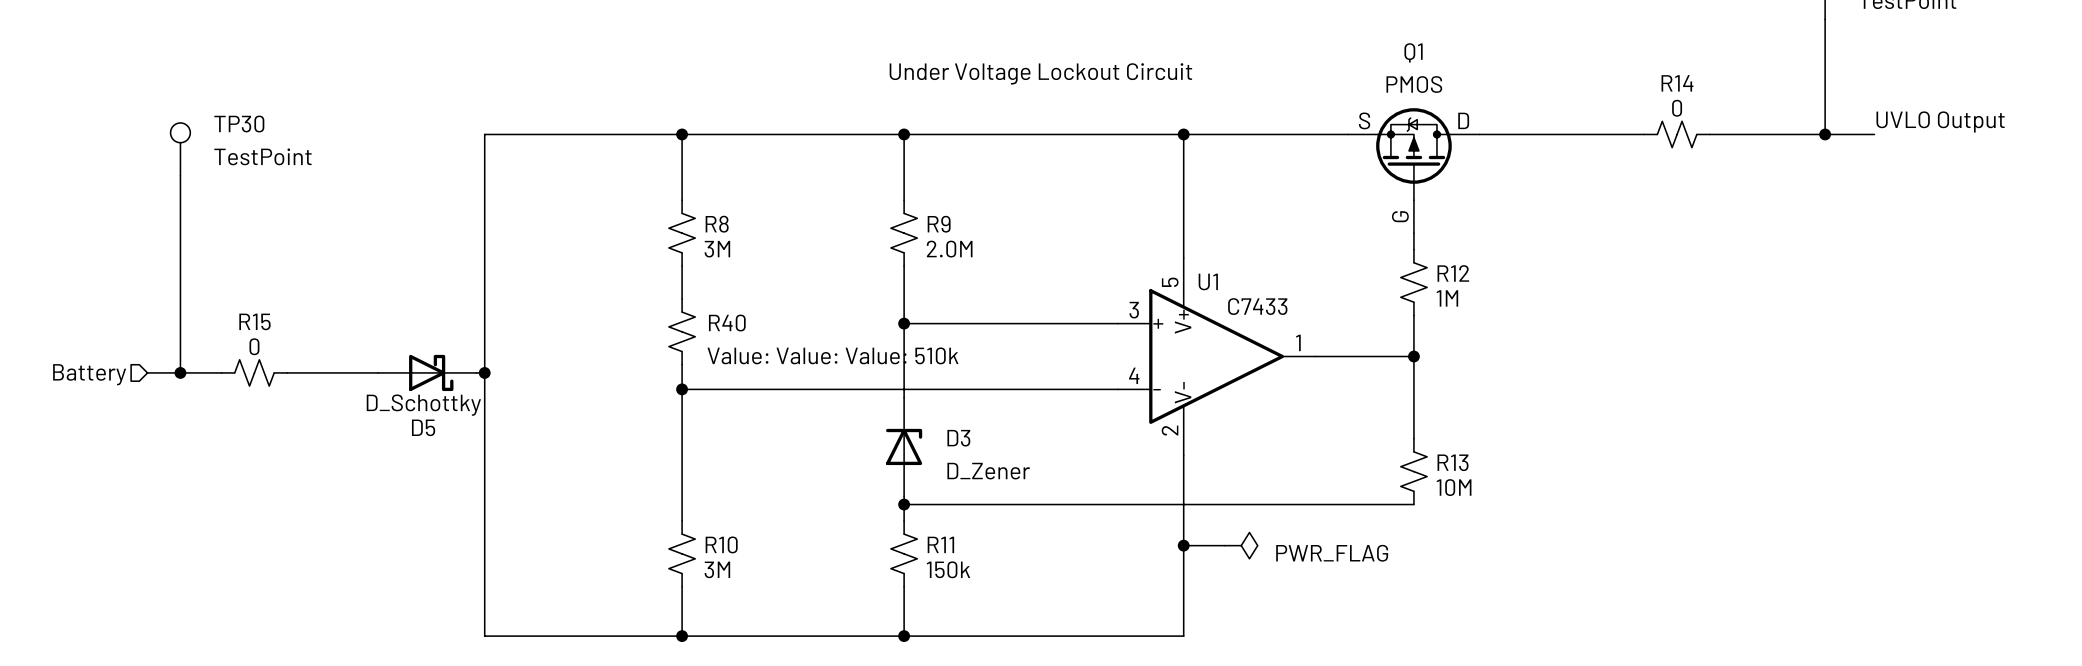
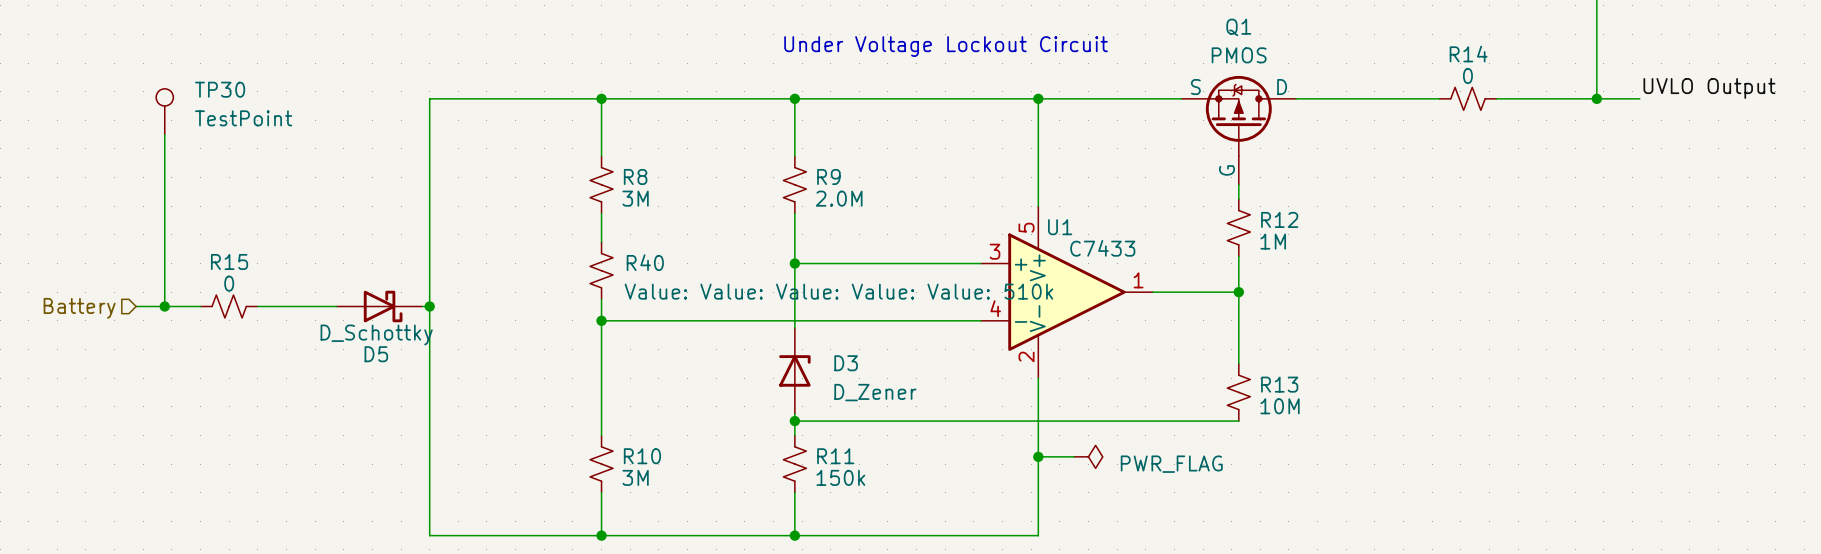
R40 value: Value: Value: Value: 510k (833, 355) -> Value: Value: Value: Value: Value: 510k (838, 291)

